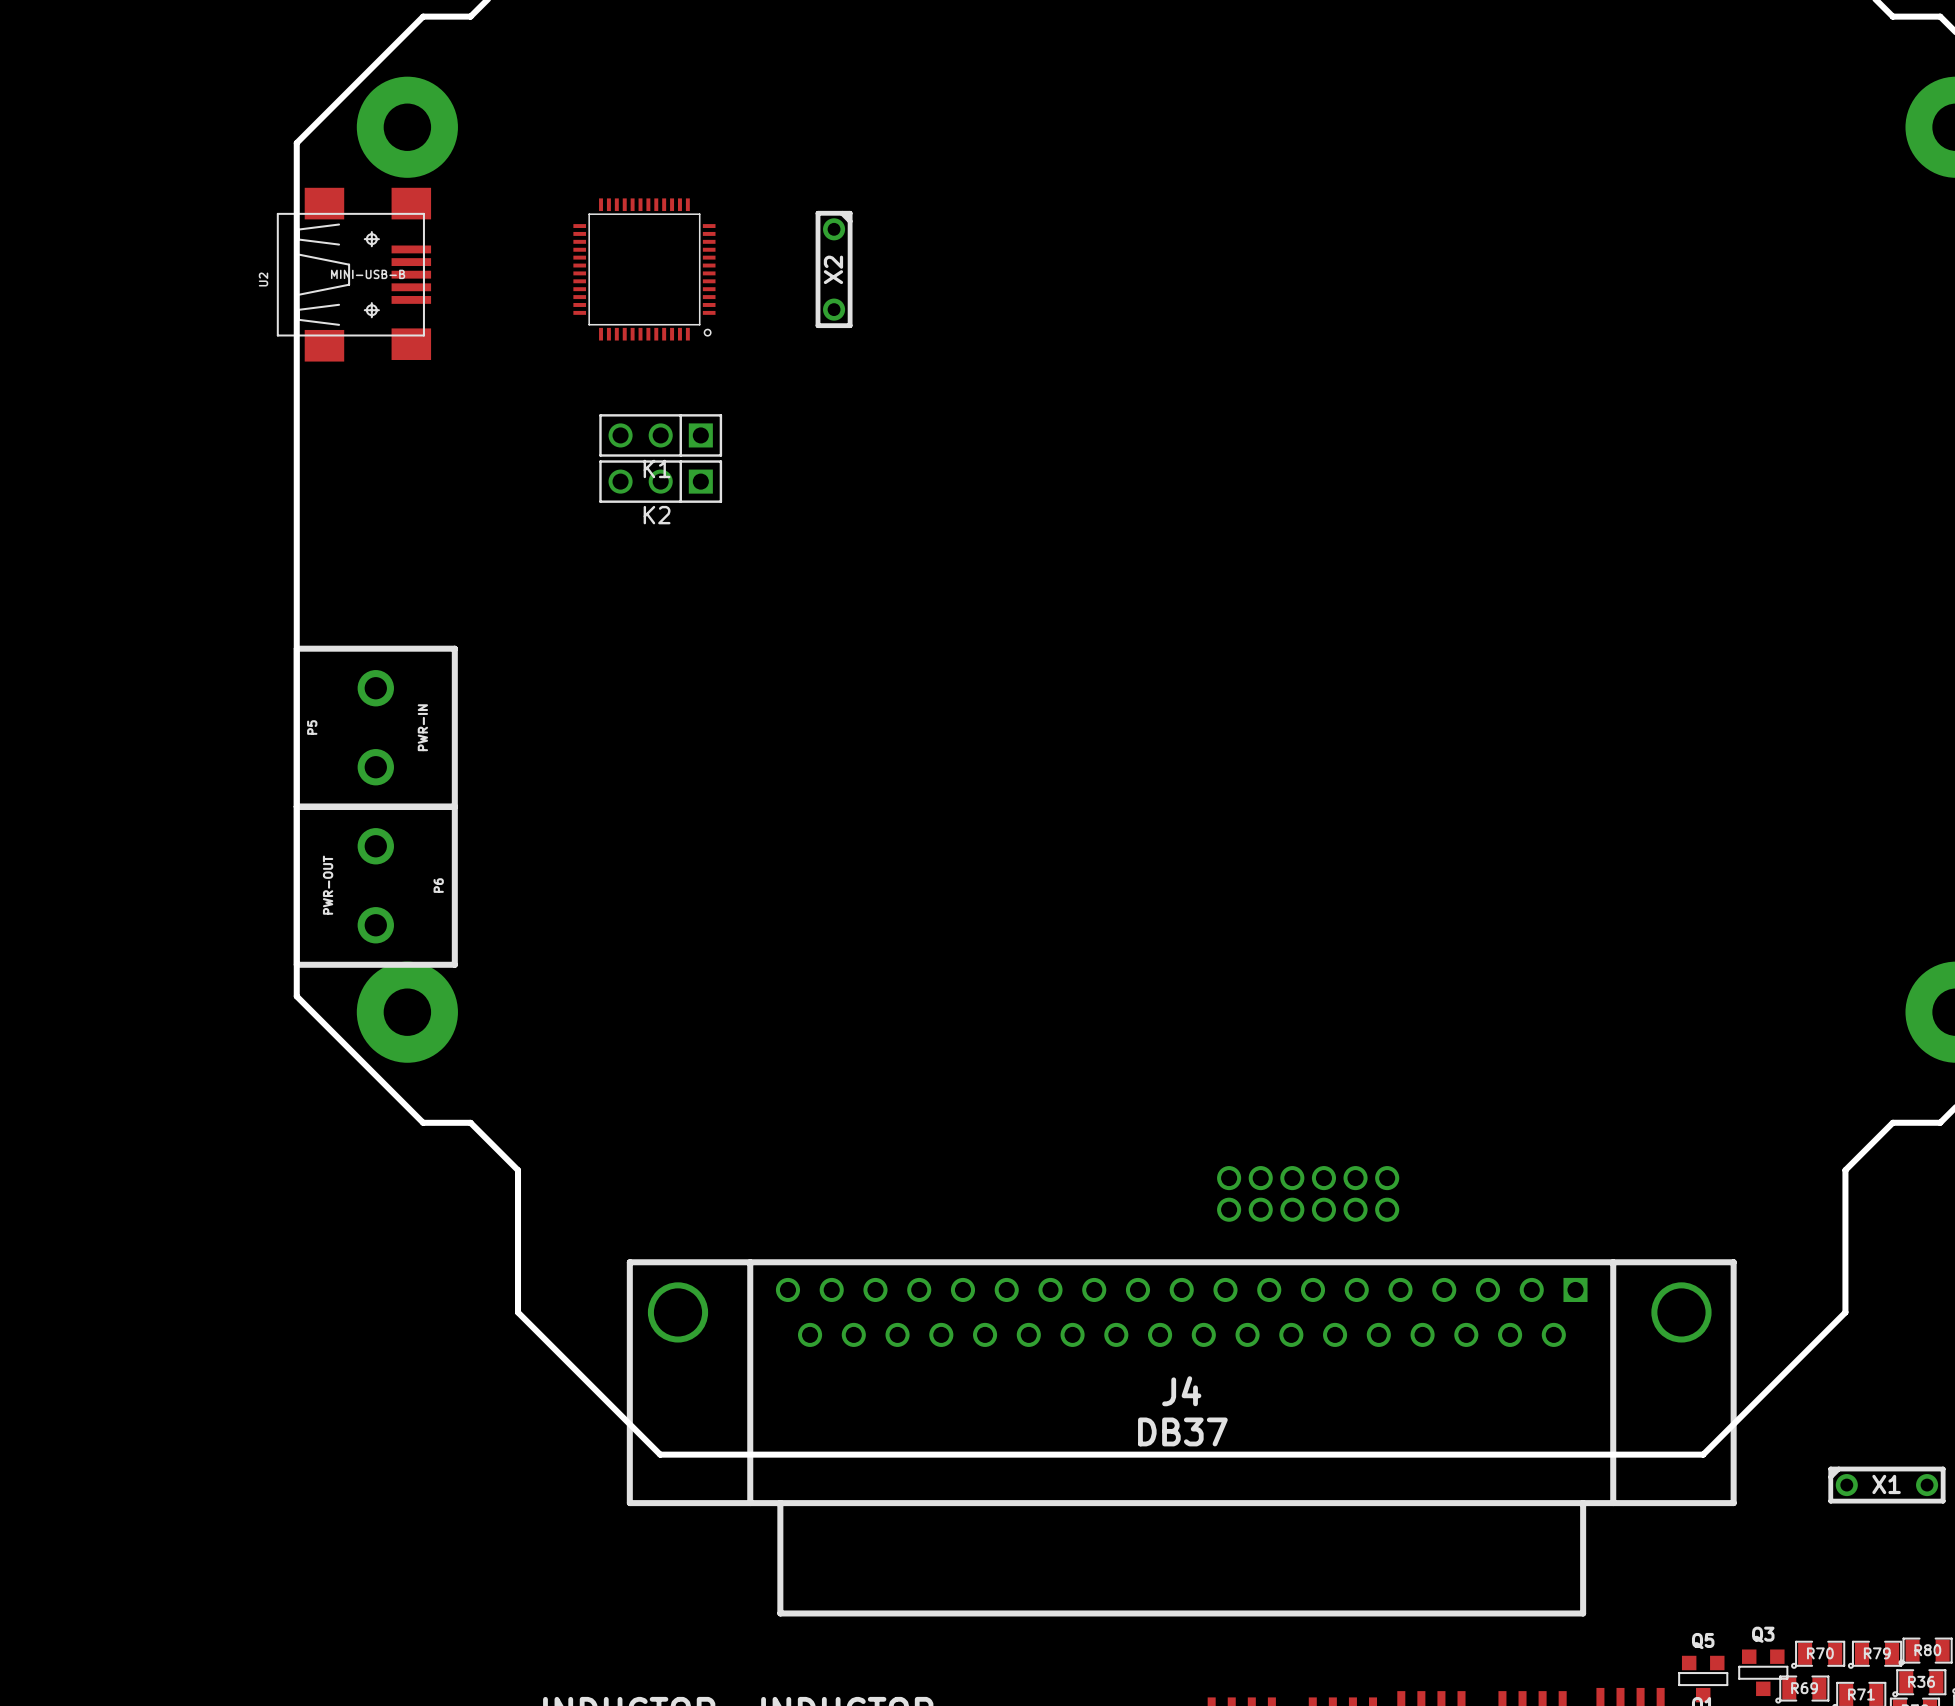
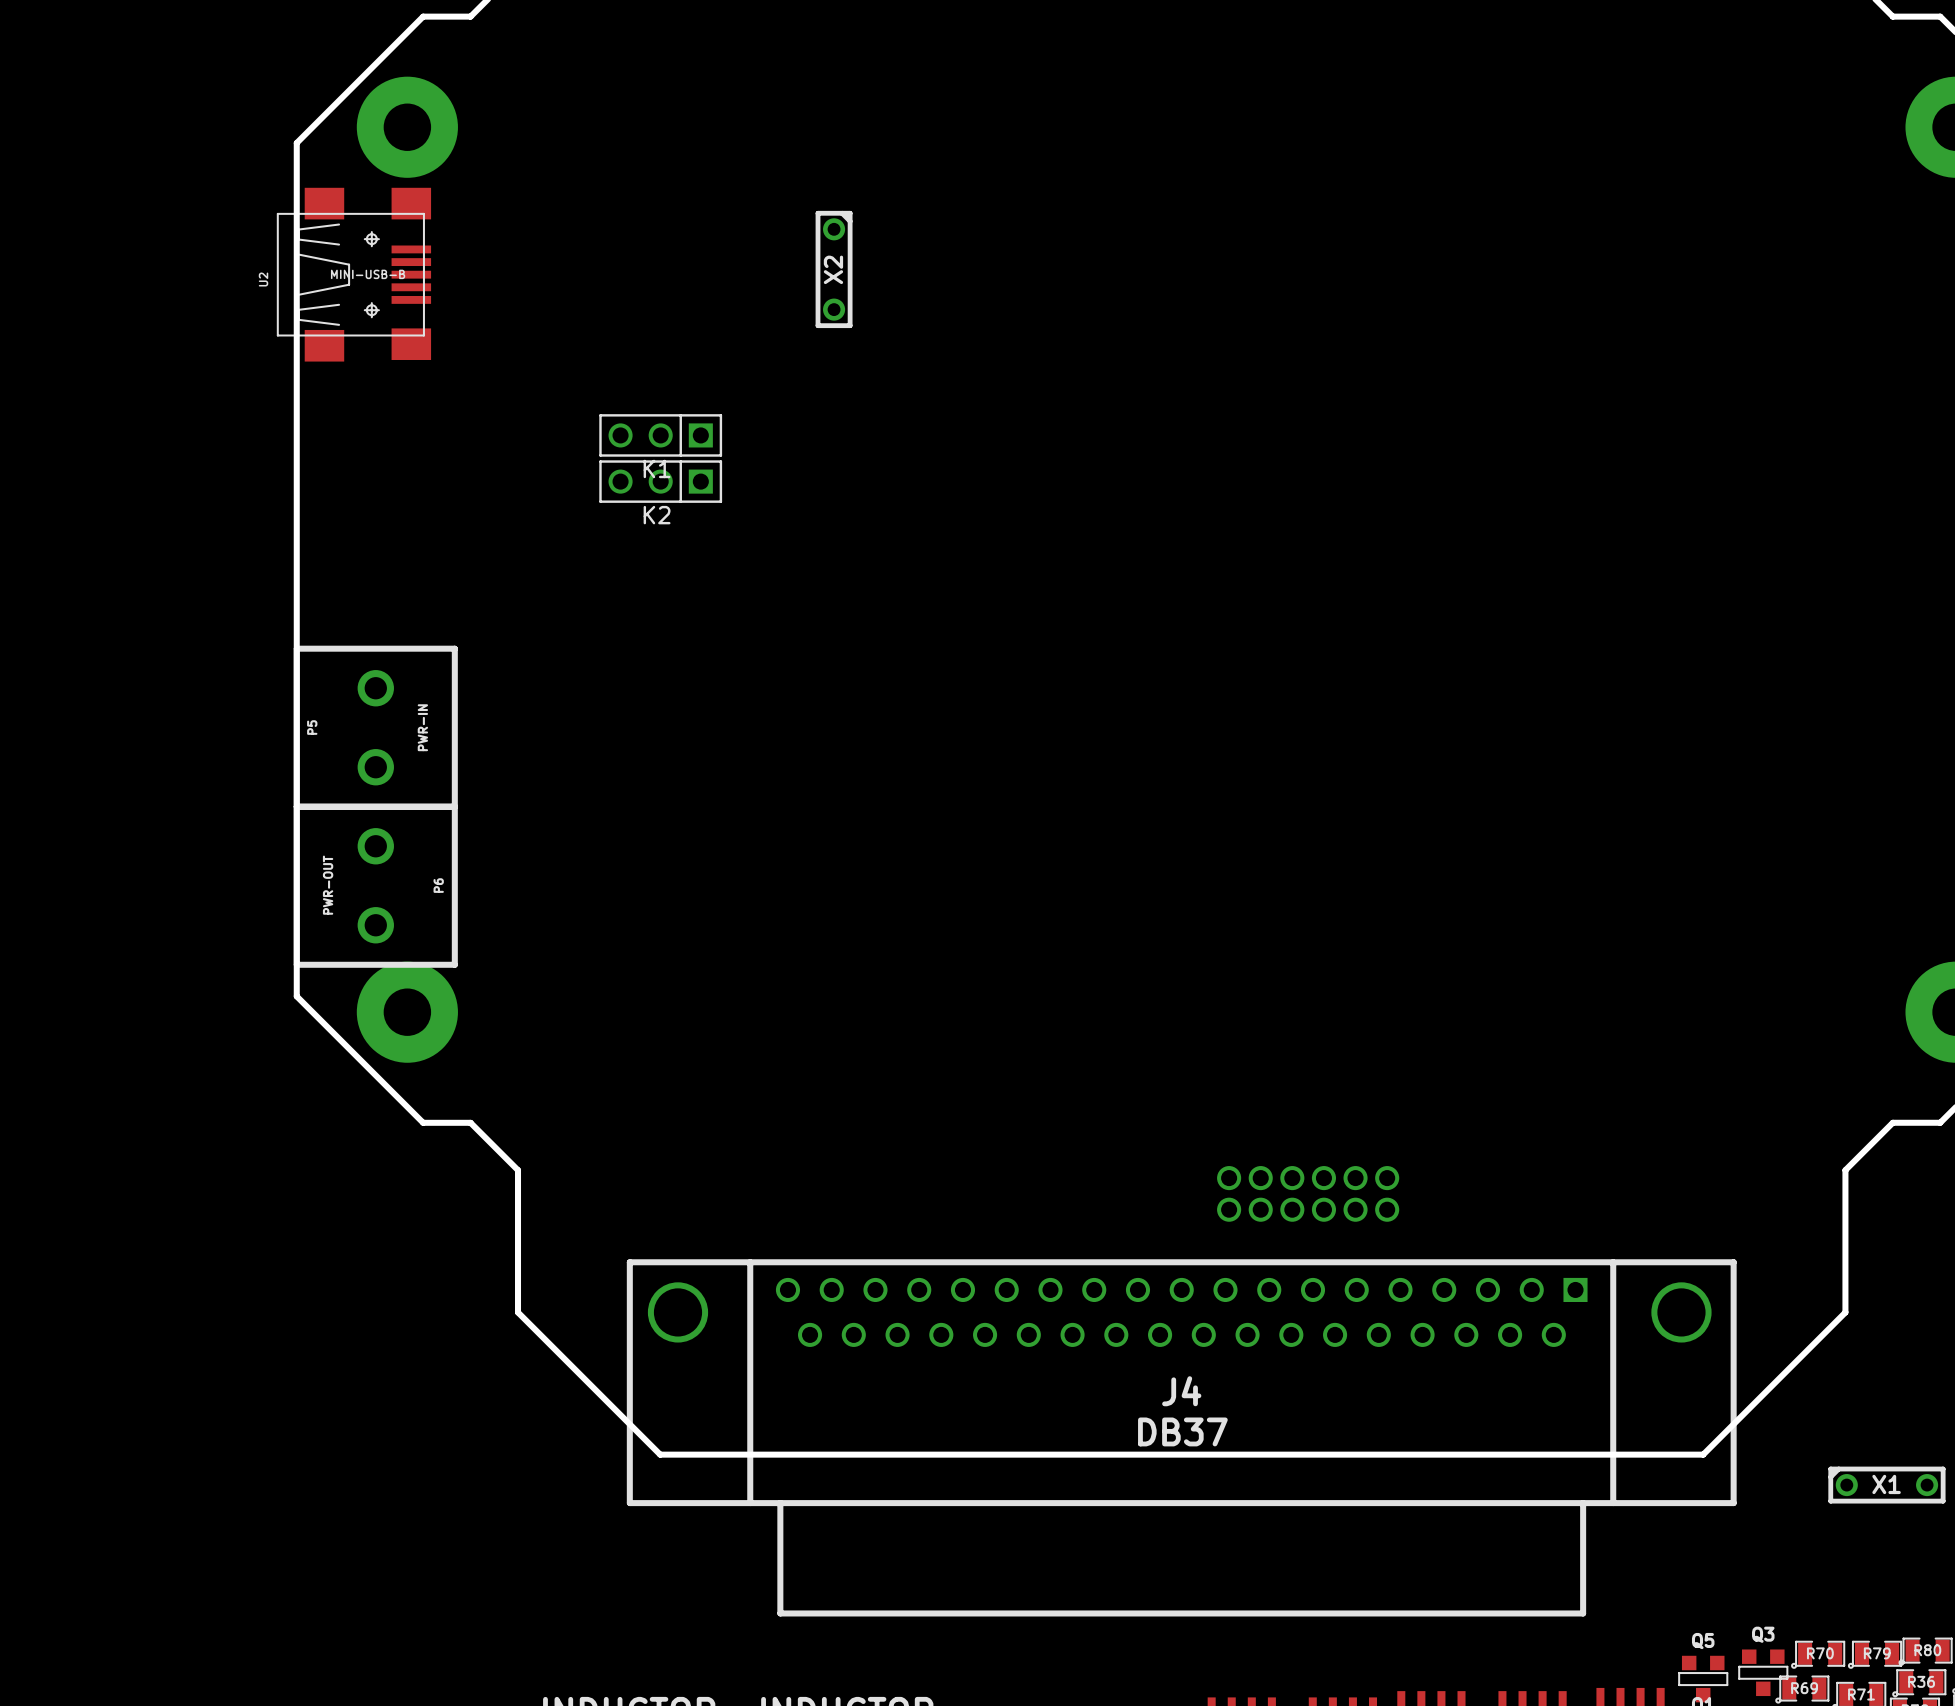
part: (644, 269) -> none

